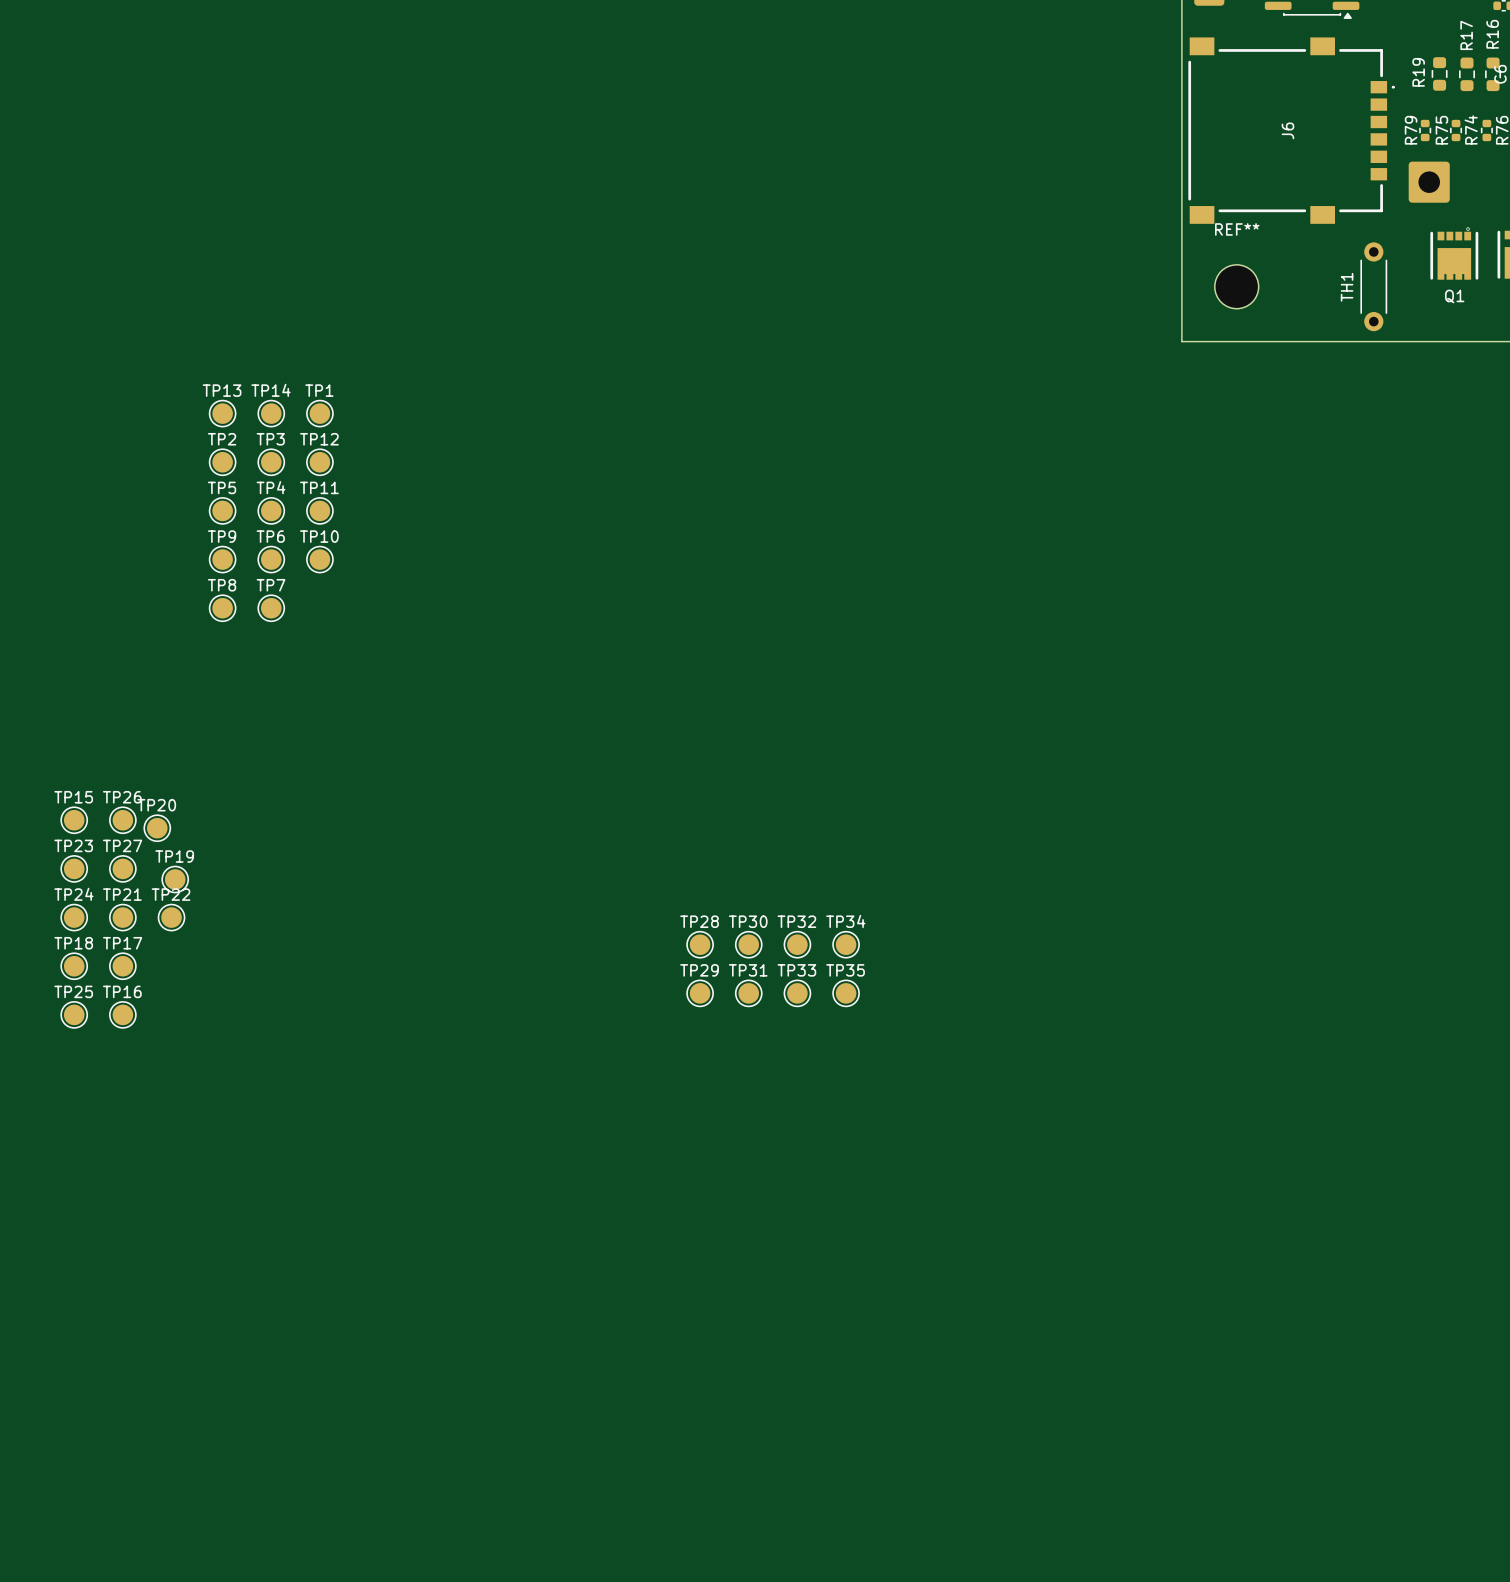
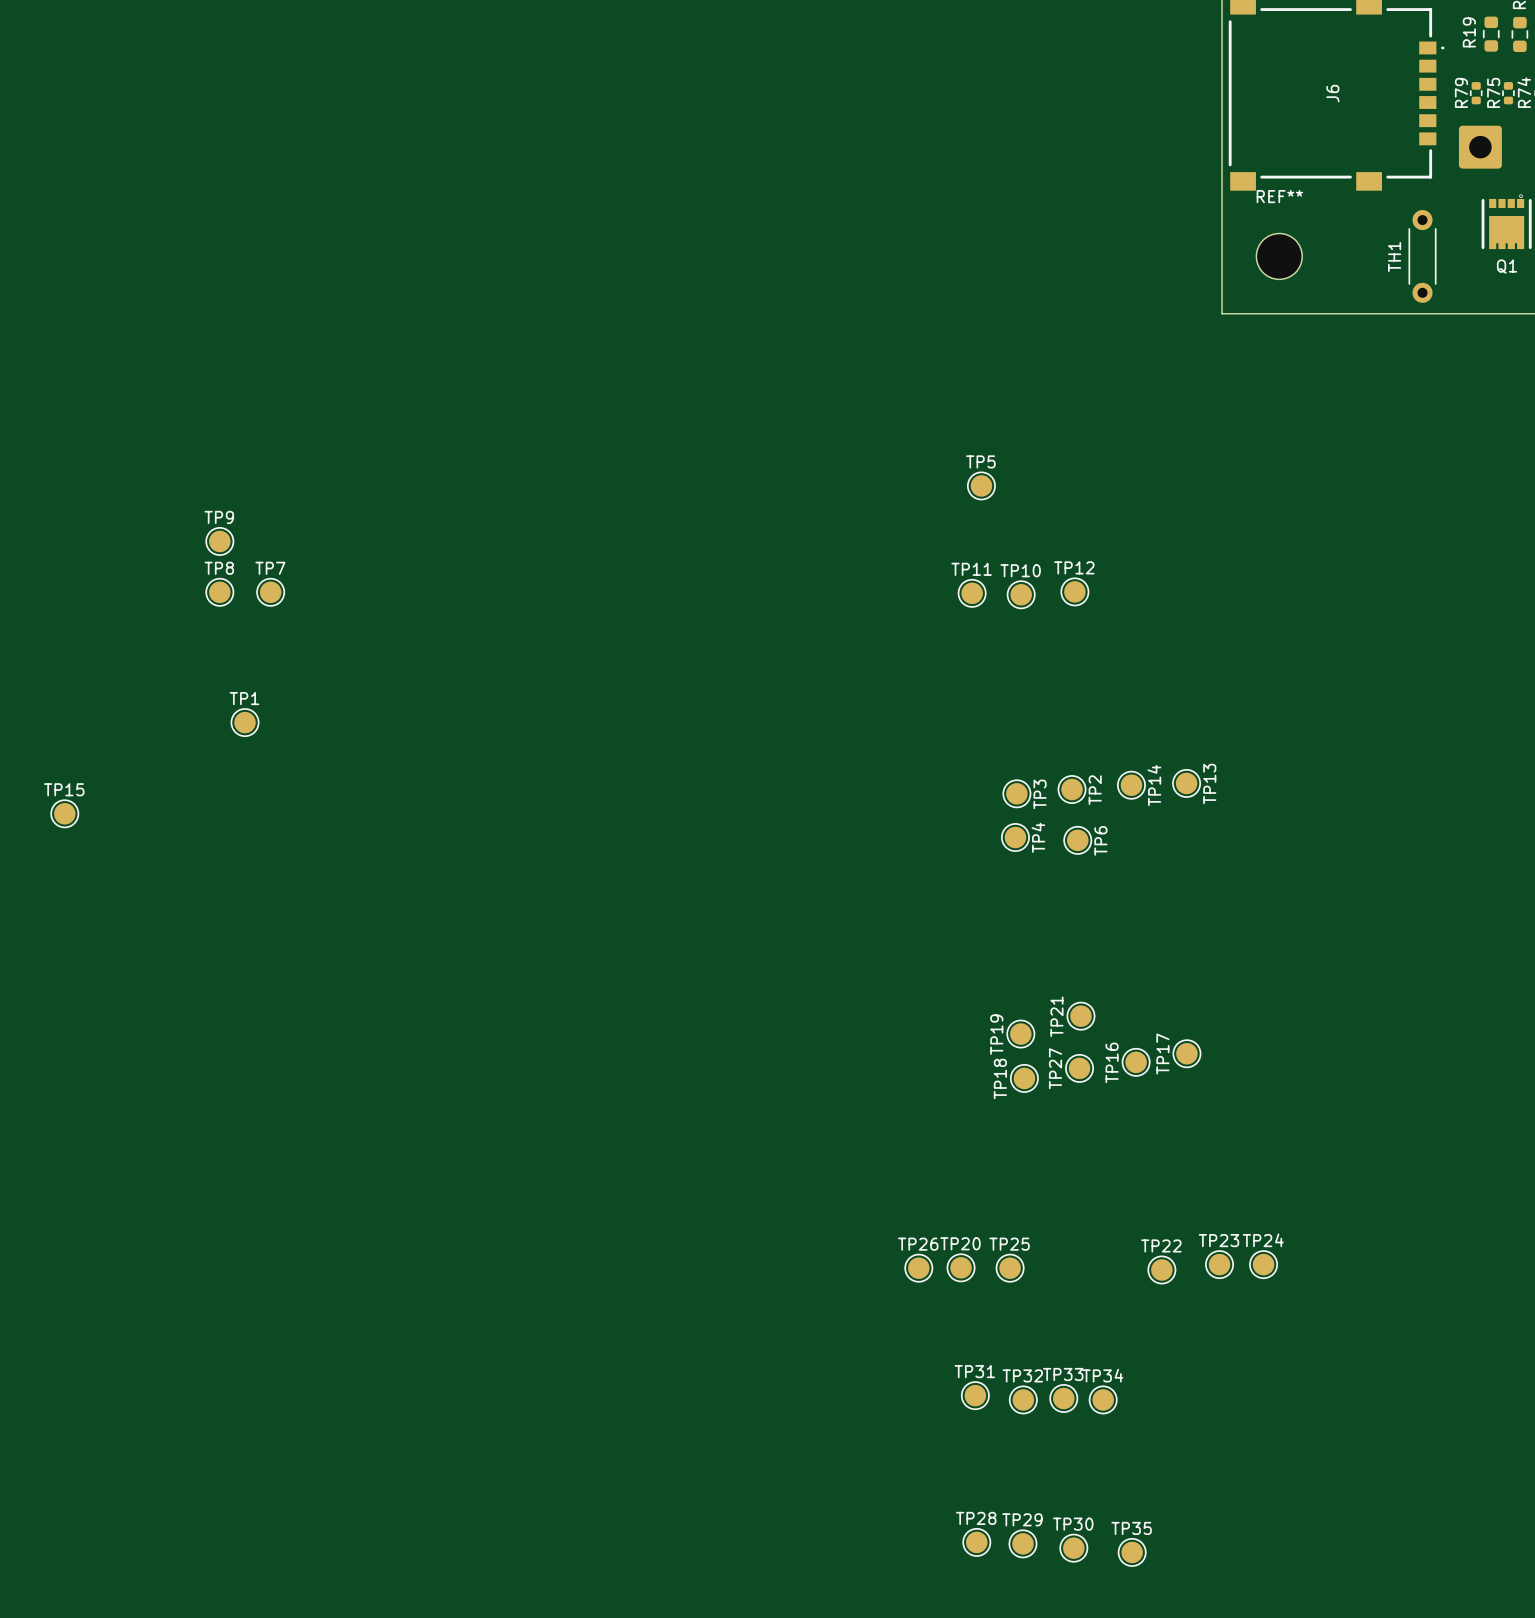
TP13 name rotation: 0° (222, 390) -> 90° counterclockwise (1209, 783)
TP14 name rotation: 0° (271, 390) -> 90° counterclockwise (1154, 785)
TP13 position: (222, 413) -> (1186, 783)
TP14 position: (271, 413) -> (1131, 785)
TP1 position: (319, 413) -> (245, 722)
TP2 name rotation: 0° (222, 439) -> 90° counterclockwise (1095, 790)
TP3 name rotation: 0° (270, 439) -> 90° counterclockwise (1040, 794)
TP2 position: (222, 462) -> (1072, 789)
TP3 position: (271, 462) -> (1016, 793)
TP12 position: (319, 462) -> (1074, 591)
TP4 name rotation: 0° (271, 487) -> 90° counterclockwise (1038, 837)
TP5 position: (222, 510) -> (981, 485)
TP4 position: (271, 510) -> (1015, 837)
TP11 position: (319, 510) -> (972, 593)
TP6 name rotation: 0° (270, 536) -> 90° counterclockwise (1100, 840)
TP6 position: (271, 559) -> (1077, 840)
TP10 position: (319, 559) -> (1021, 594)
TP26 position: (122, 820) -> (918, 1268)
TP20 position: (157, 828) -> (961, 1267)
TP27 name rotation: 0° (122, 845) -> 90° counterclockwise (1055, 1068)
TP19 name rotation: 0° (174, 856) -> 90° counterclockwise (996, 1034)
TP23 position: (74, 868) -> (1219, 1264)
TP27 position: (122, 868) -> (1079, 1068)
TP19 position: (175, 879) -> (1020, 1034)
TP21 name rotation: 0° (122, 894) -> 90° counterclockwise (1056, 1016)
TP24 position: (74, 917) -> (1263, 1264)
TP21 position: (122, 917) -> (1080, 1016)
TP22 position: (171, 917) -> (1161, 1269)
TP18 name rotation: 0° (73, 943) -> 90° counterclockwise (1000, 1078)
TP17 name rotation: 0° (122, 943) -> 90° counterclockwise (1162, 1054)
TP28 position: (700, 944) -> (976, 1542)
TP30 position: (748, 944) -> (1073, 1548)
TP32 position: (797, 944) -> (1023, 1399)
TP34 position: (846, 944) -> (1103, 1399)
TP18 position: (74, 966) -> (1024, 1078)
TP17 position: (122, 966) -> (1186, 1053)
TP16 name rotation: 0° (122, 991) -> 90° counterclockwise (1112, 1062)
TP29 position: (700, 993) -> (1022, 1543)
TP31 position: (748, 993) -> (975, 1395)
TP33 position: (797, 993) -> (1063, 1398)
TP35 position: (846, 993) -> (1132, 1552)
TP25 position: (74, 1014) -> (1010, 1268)
TP16 position: (122, 1014) -> (1136, 1062)

